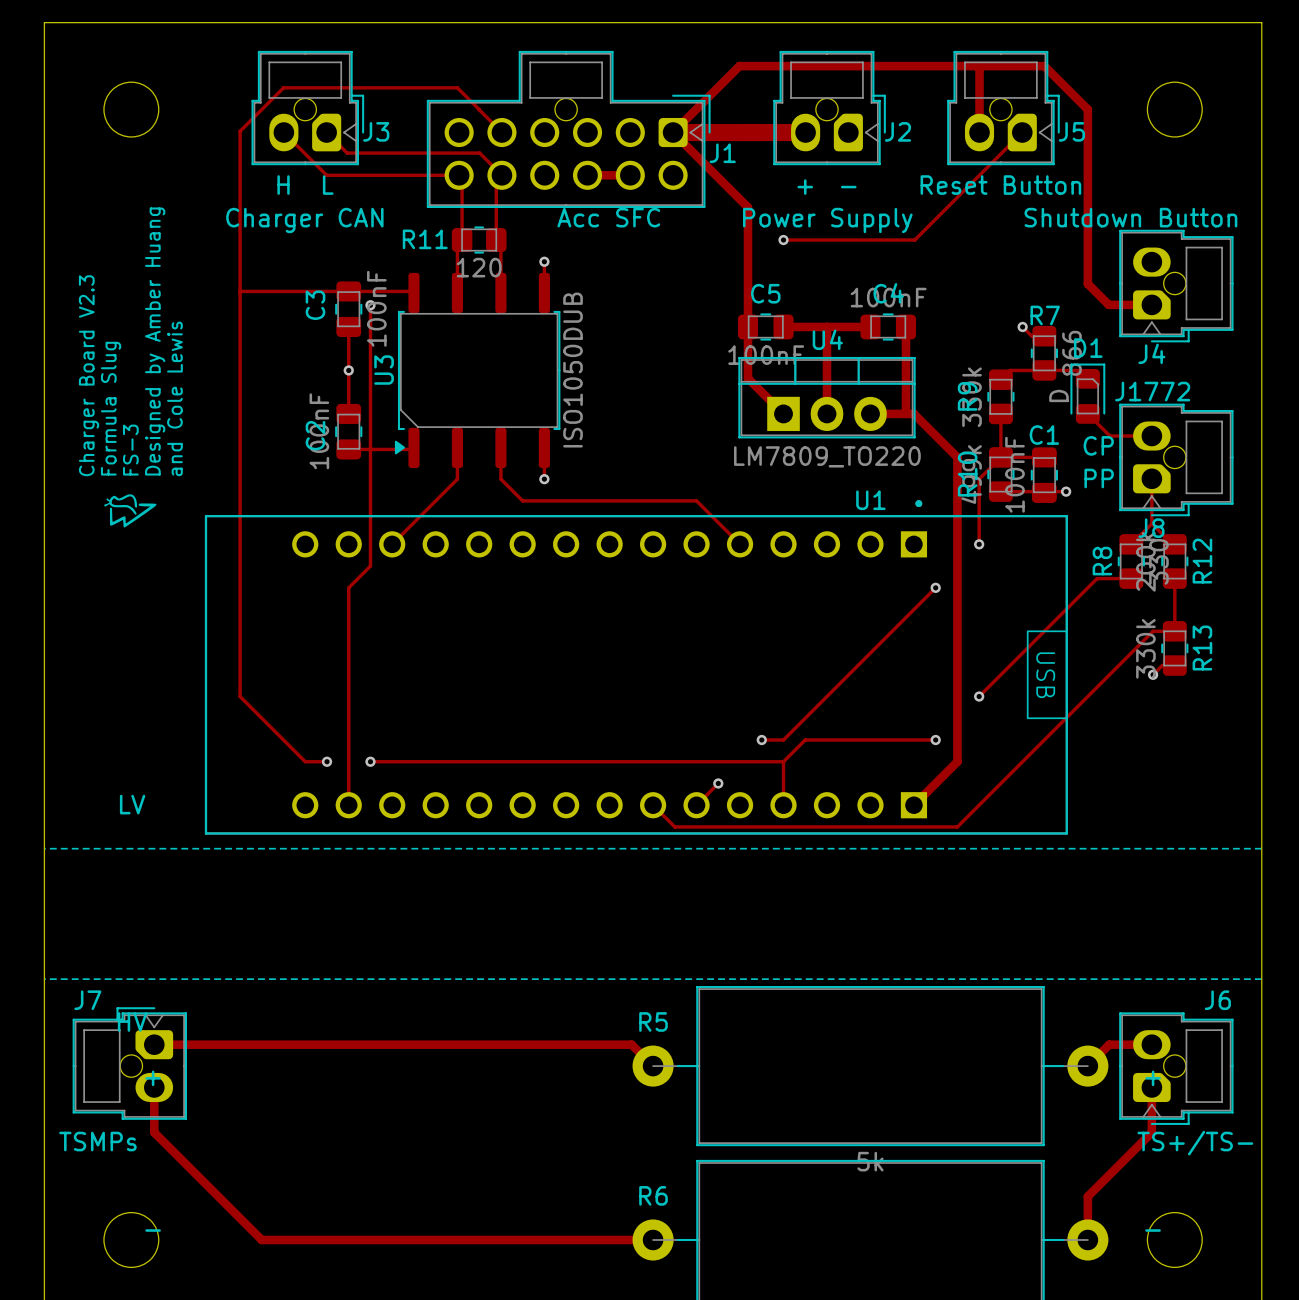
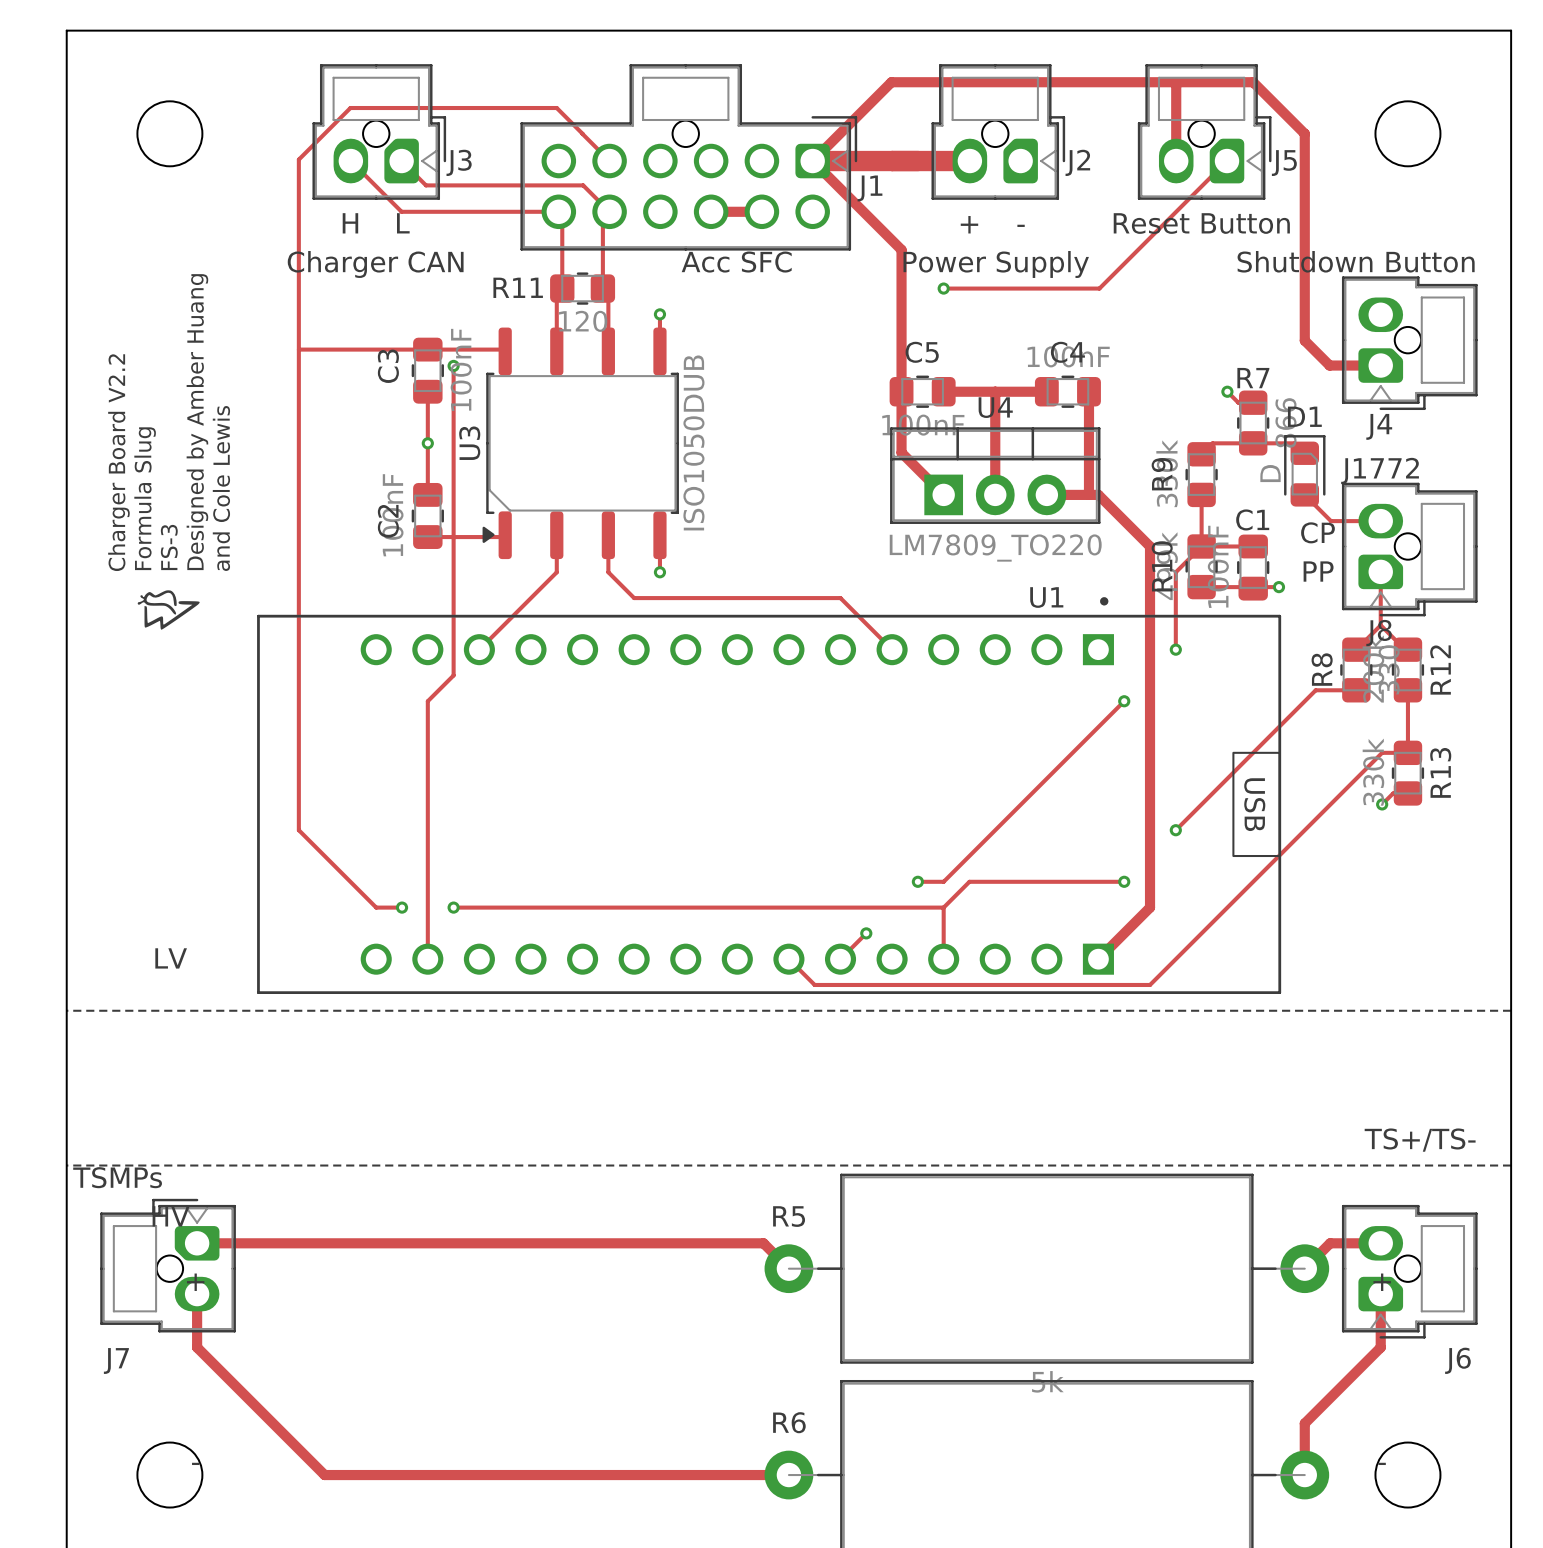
text: Charger Board V2.3 (89, 375) -> Charger Board V2.2 (118, 462)
J7 name position: J7 (87, 1000) -> J7 (116, 1361)
J6 name position: J6 (1217, 1000) -> J6 (1457, 1360)
J7 value position: TSMPs (97, 1141) -> TSMPs (117, 1177)
J6 value position: TS+/TS- (1195, 1143) -> TS+/TS- (1420, 1140)

